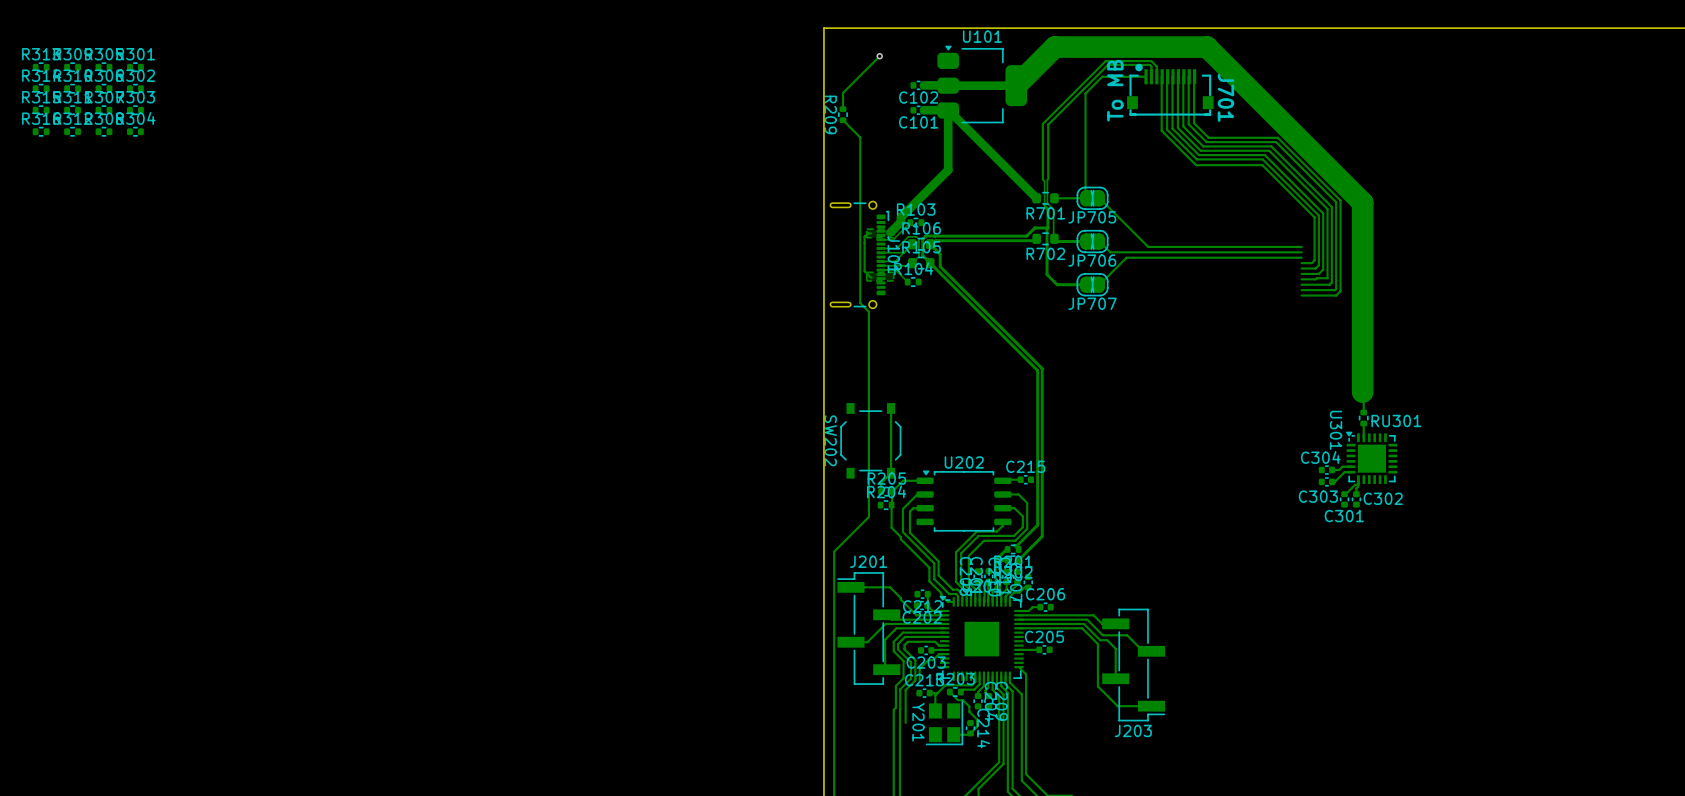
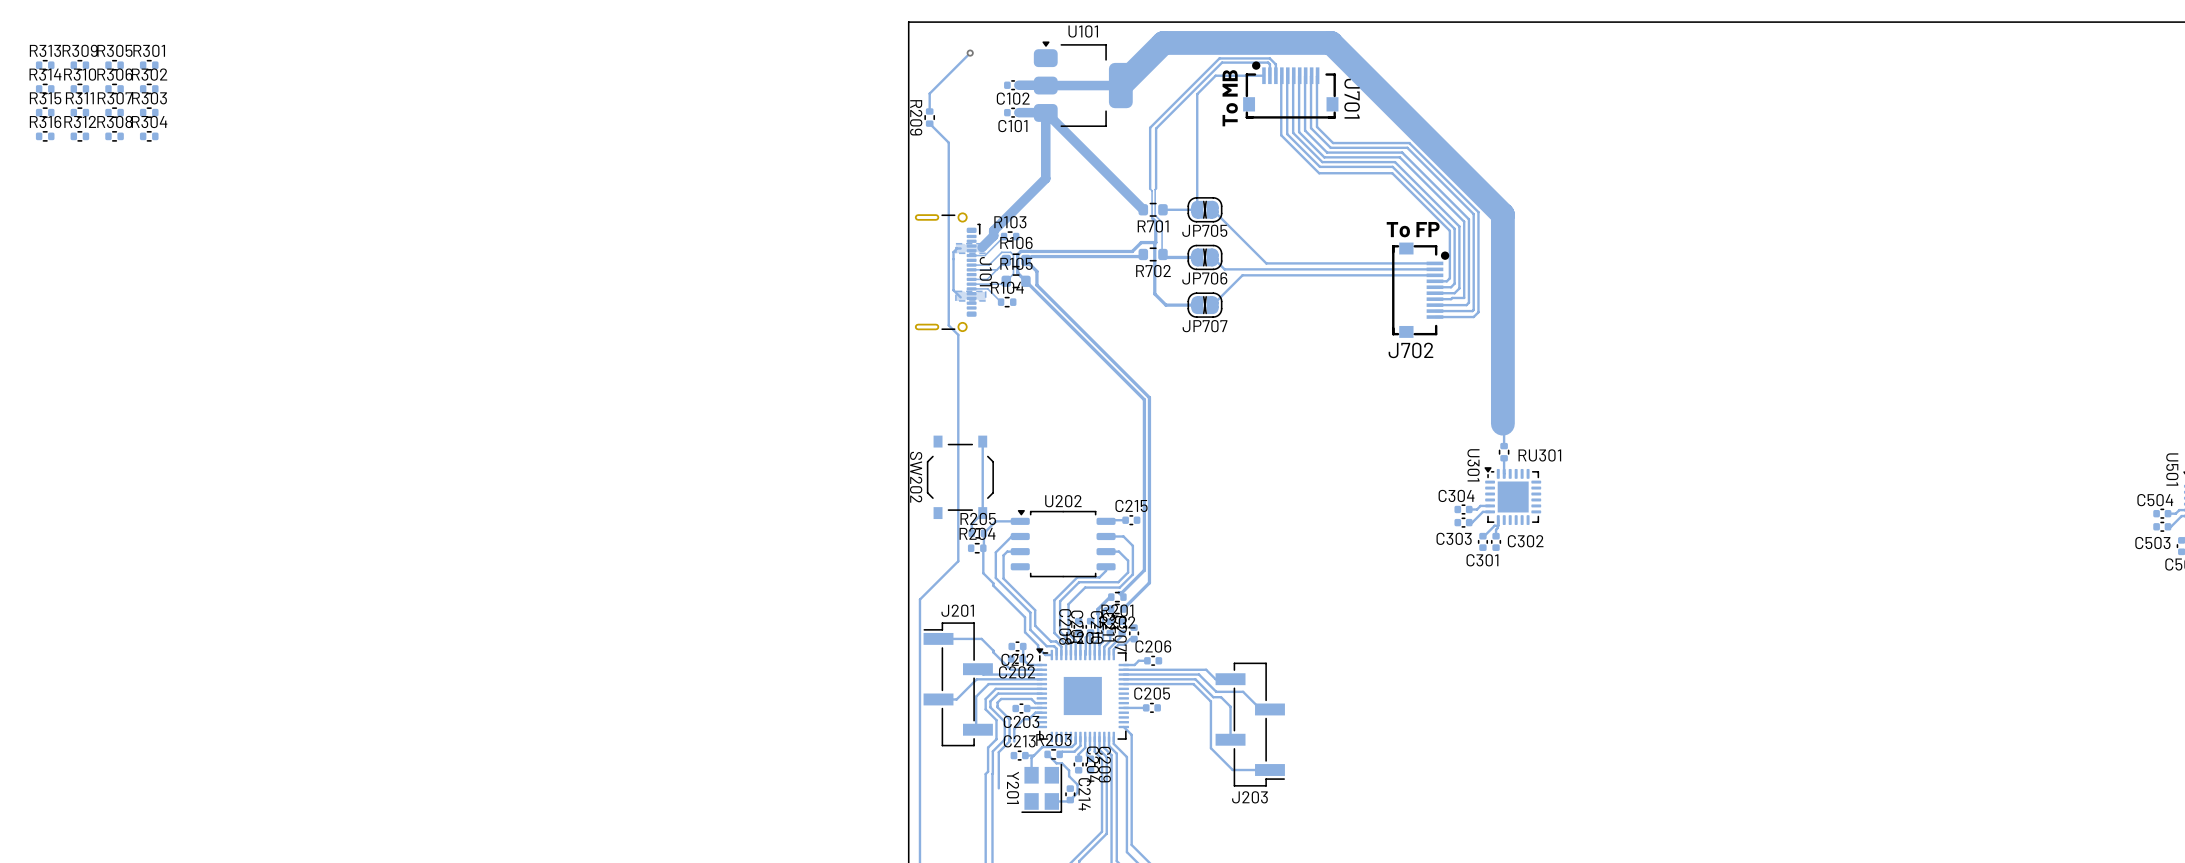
text: none -> To FP (1413, 229)
J702: none -> (1420, 290)

